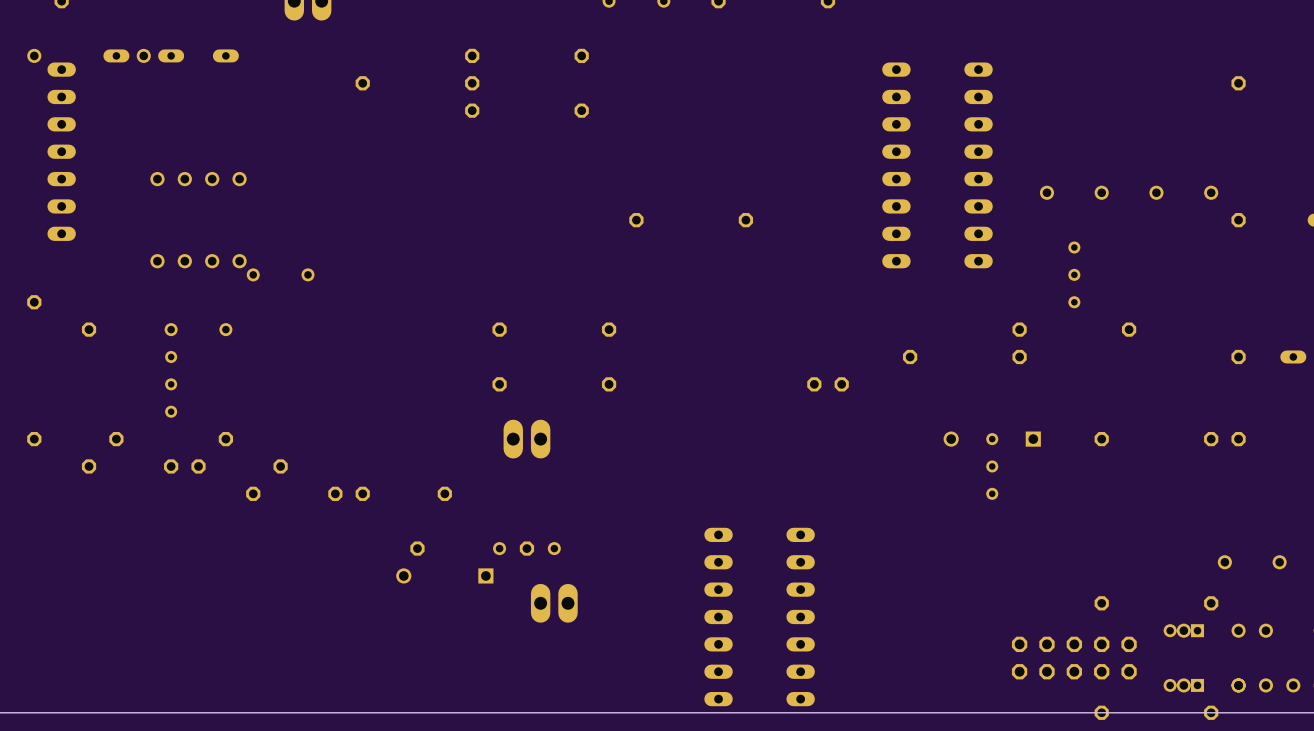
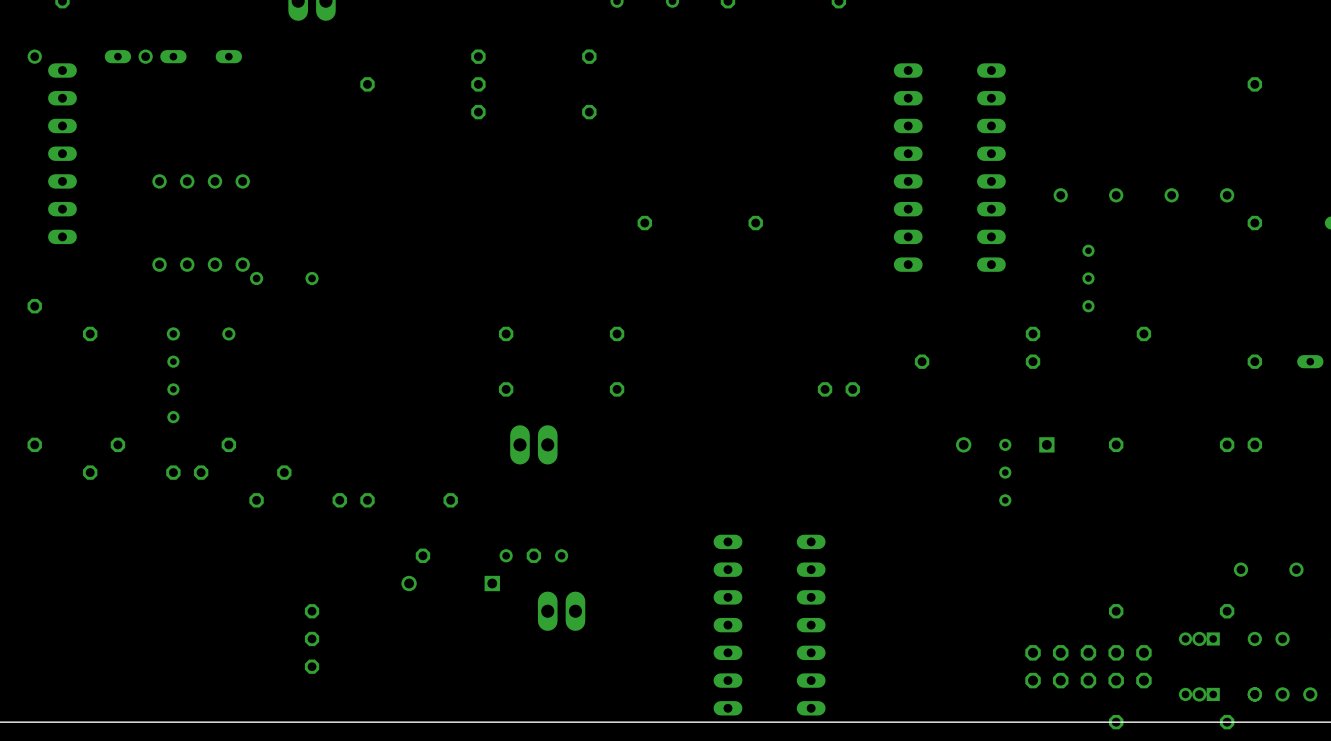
part: none -> (312, 638)

